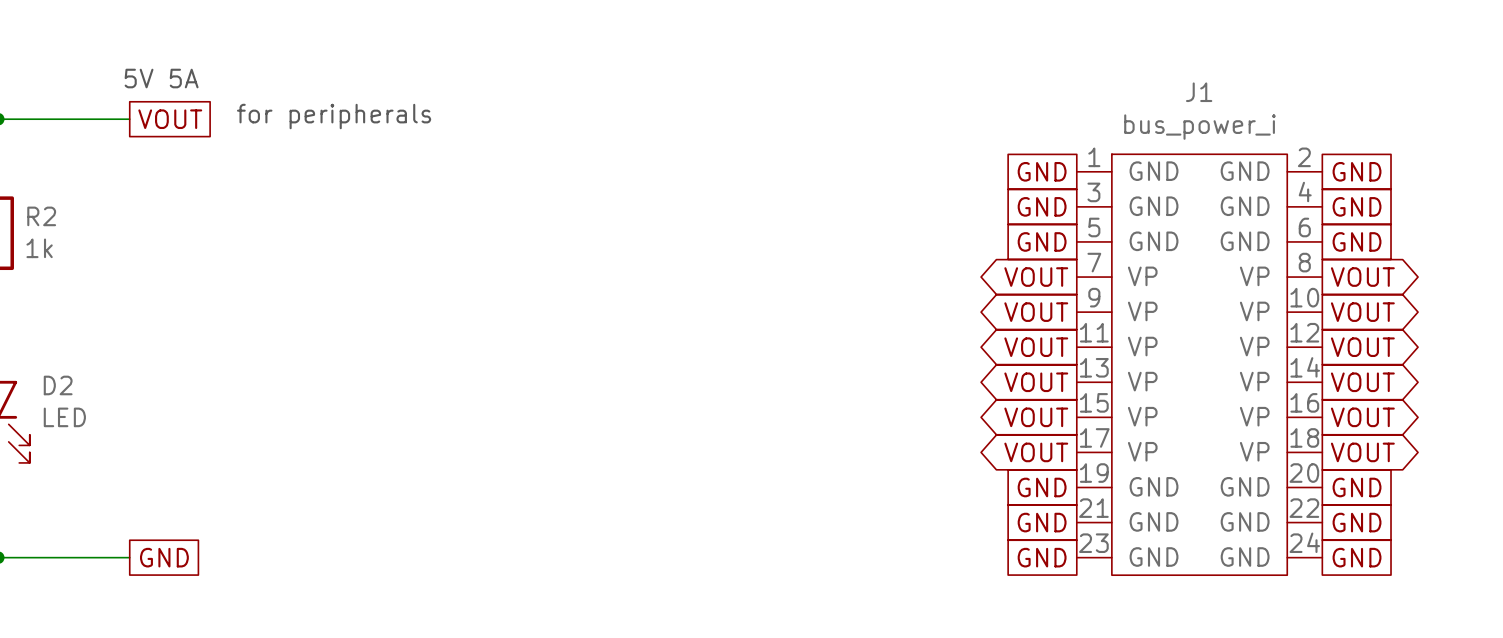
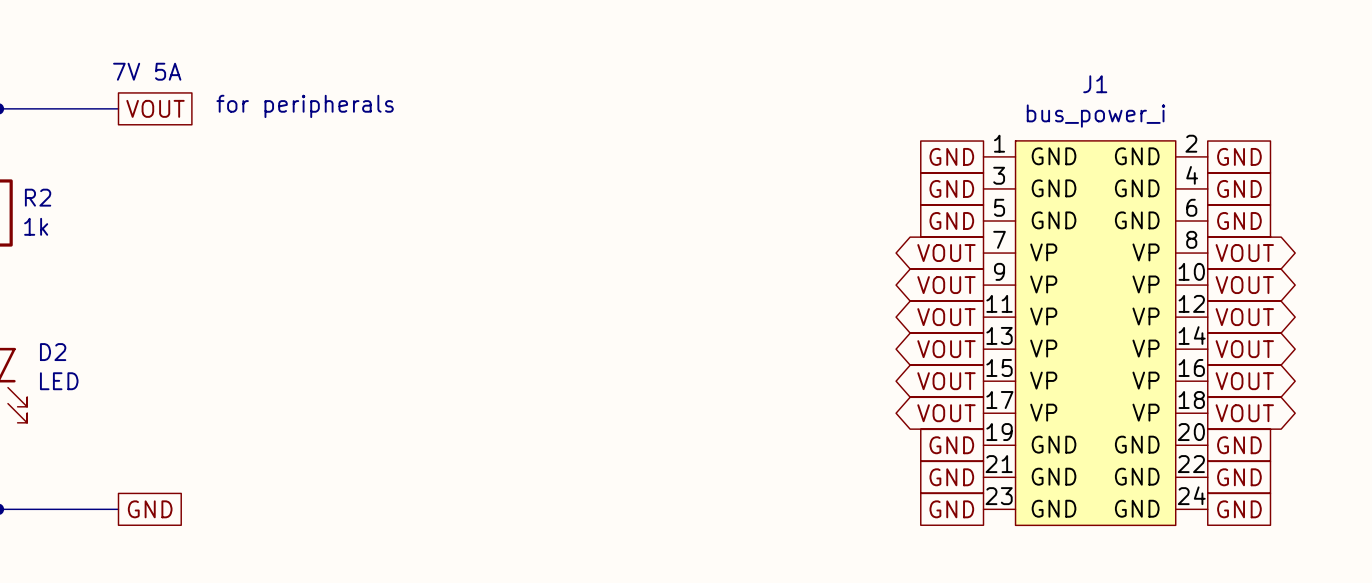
text: 5V 5A (161, 78) -> 7V 5A (147, 71)

